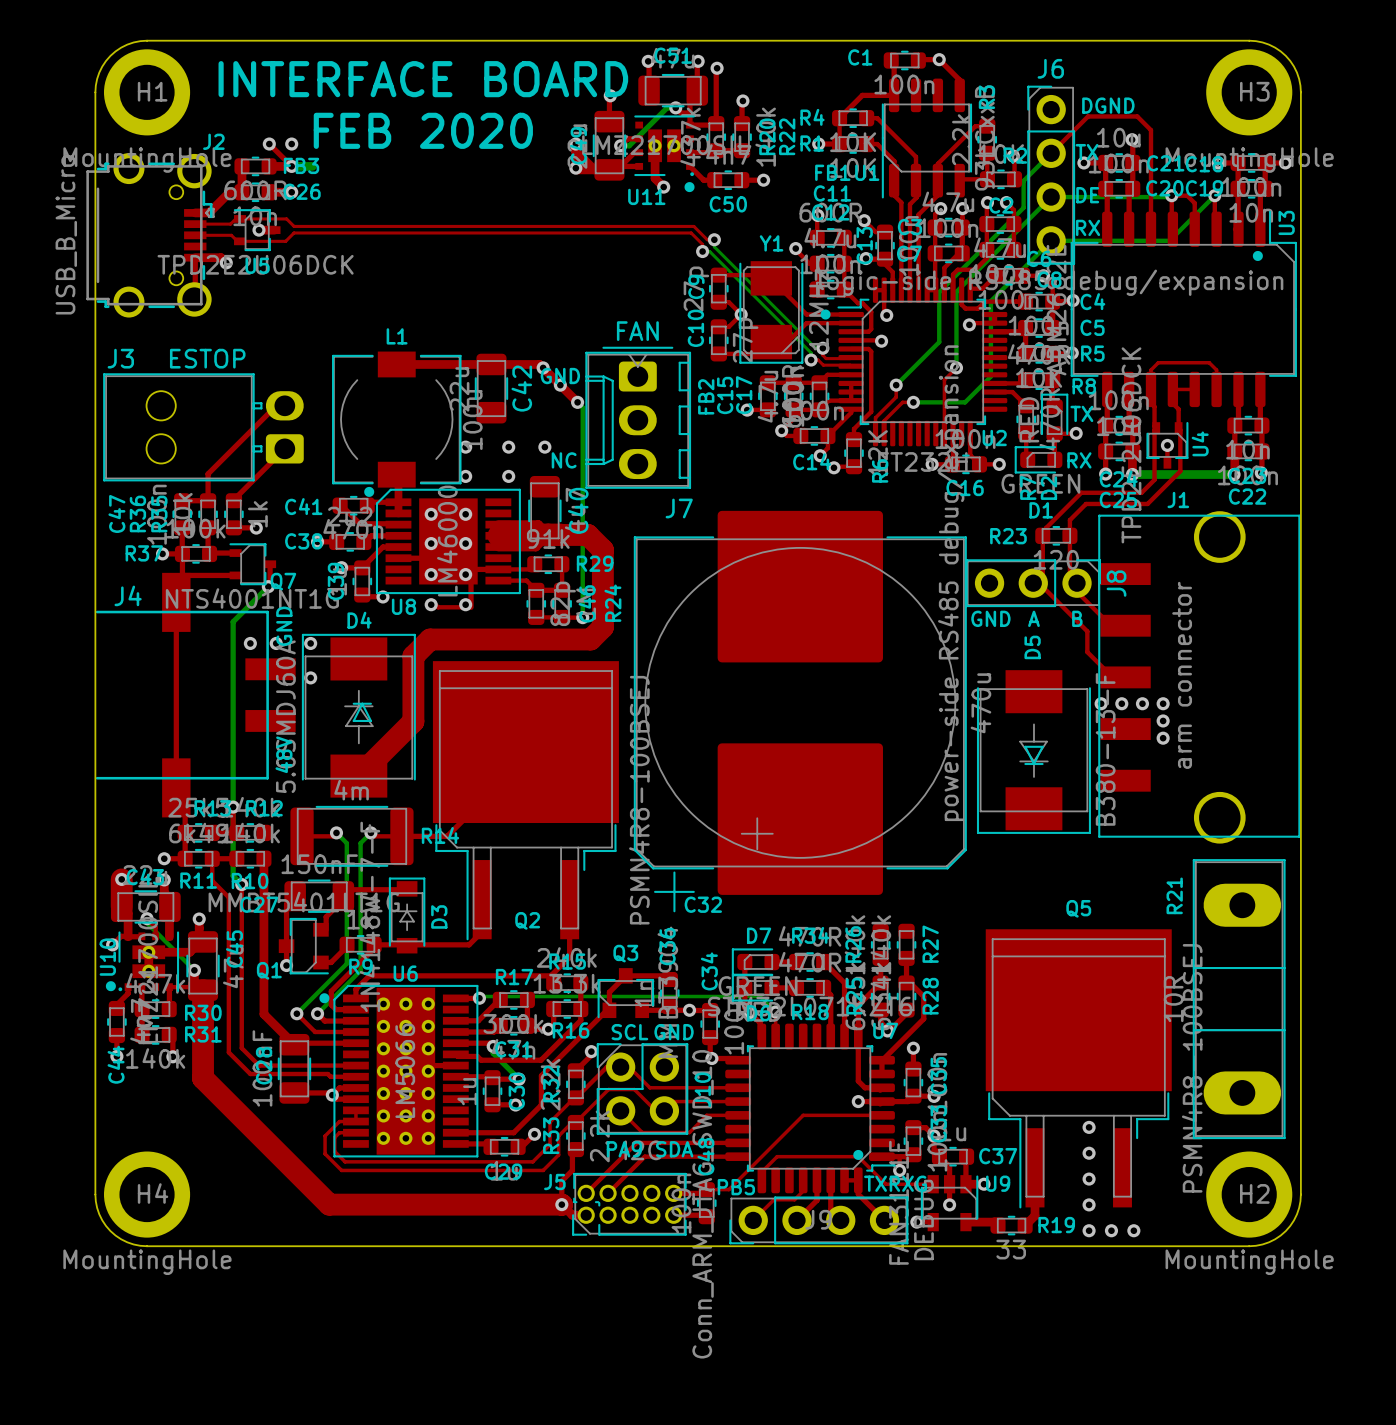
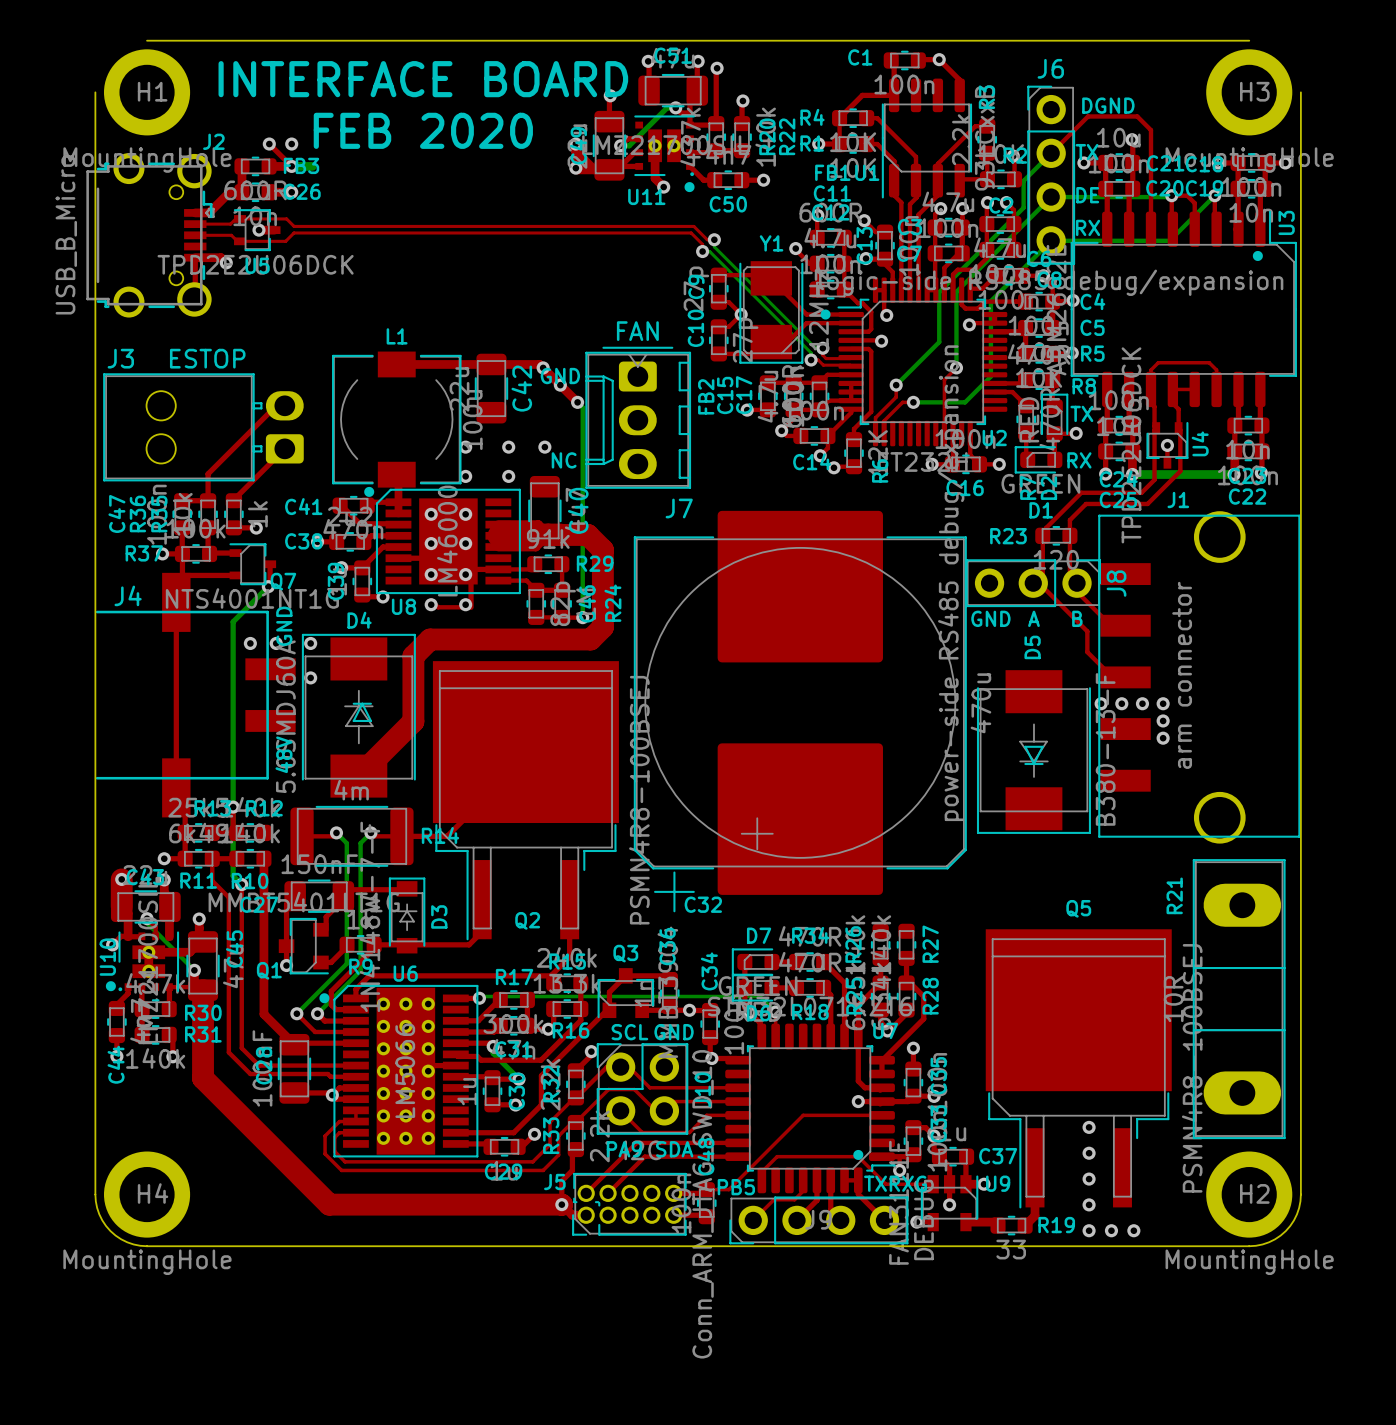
board edge: (147, 40) (127, 44) (110, 55) (99, 72) (95, 92) -> none
board edge: (1249, 40) (1269, 44) (1285, 55) (1296, 72) (1300, 92) -> none

